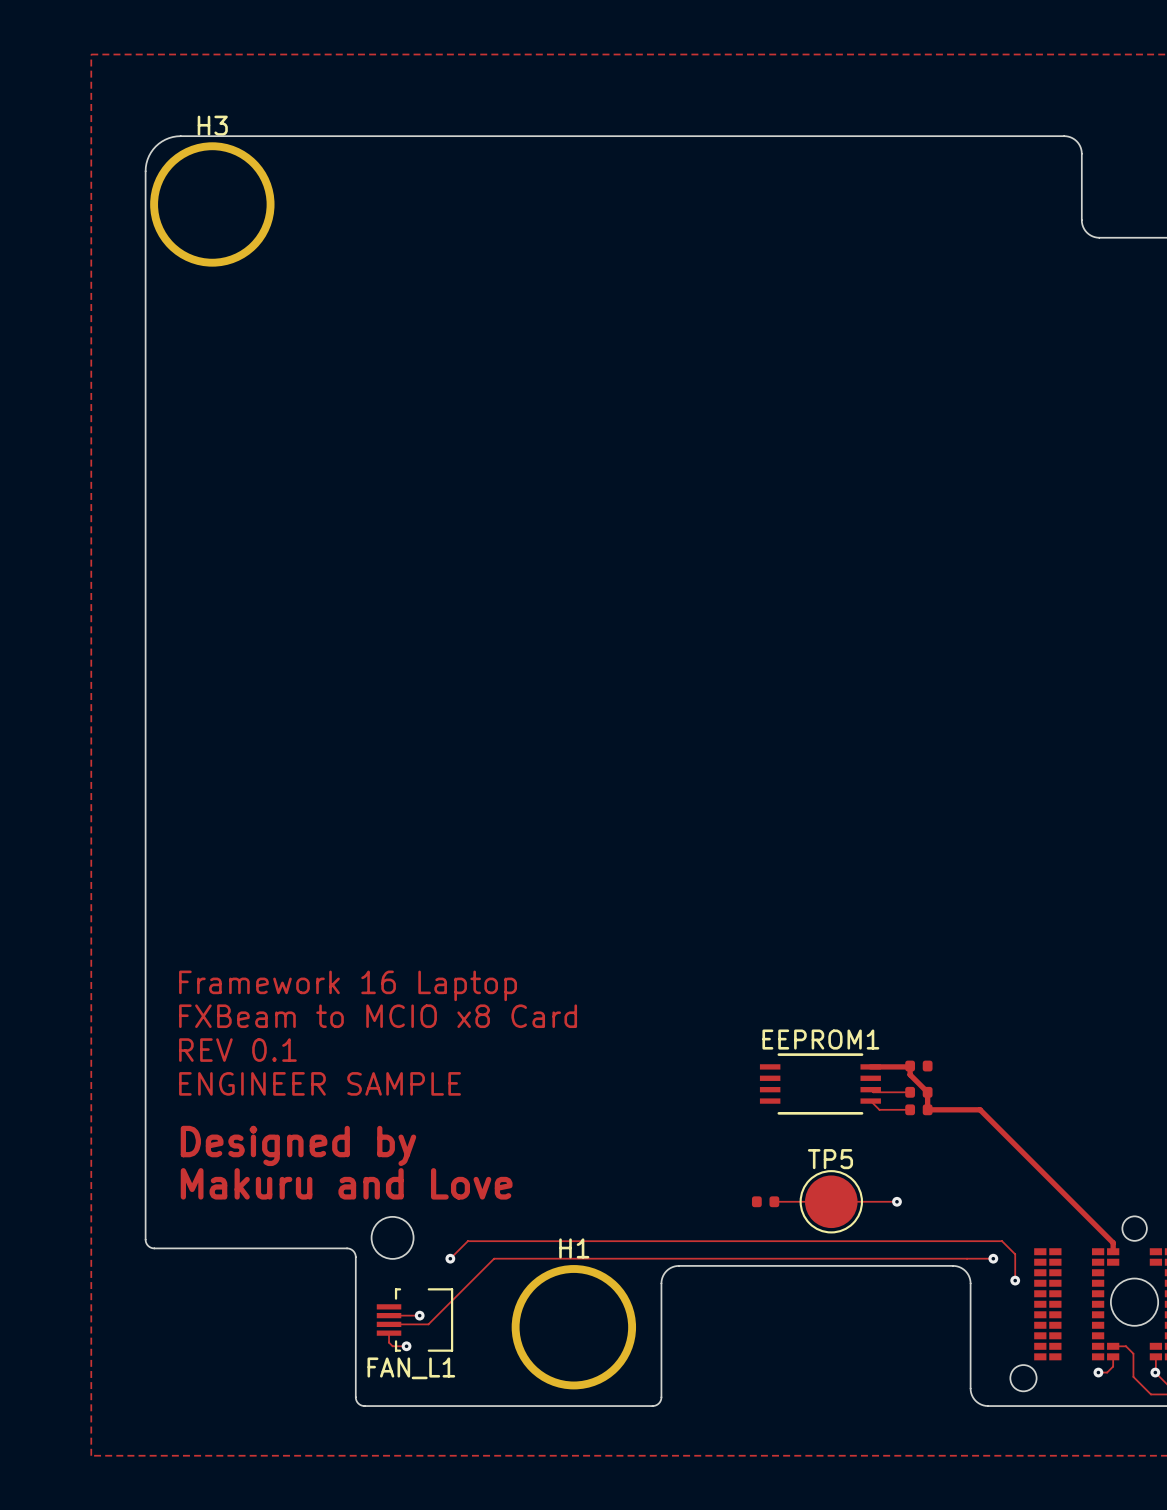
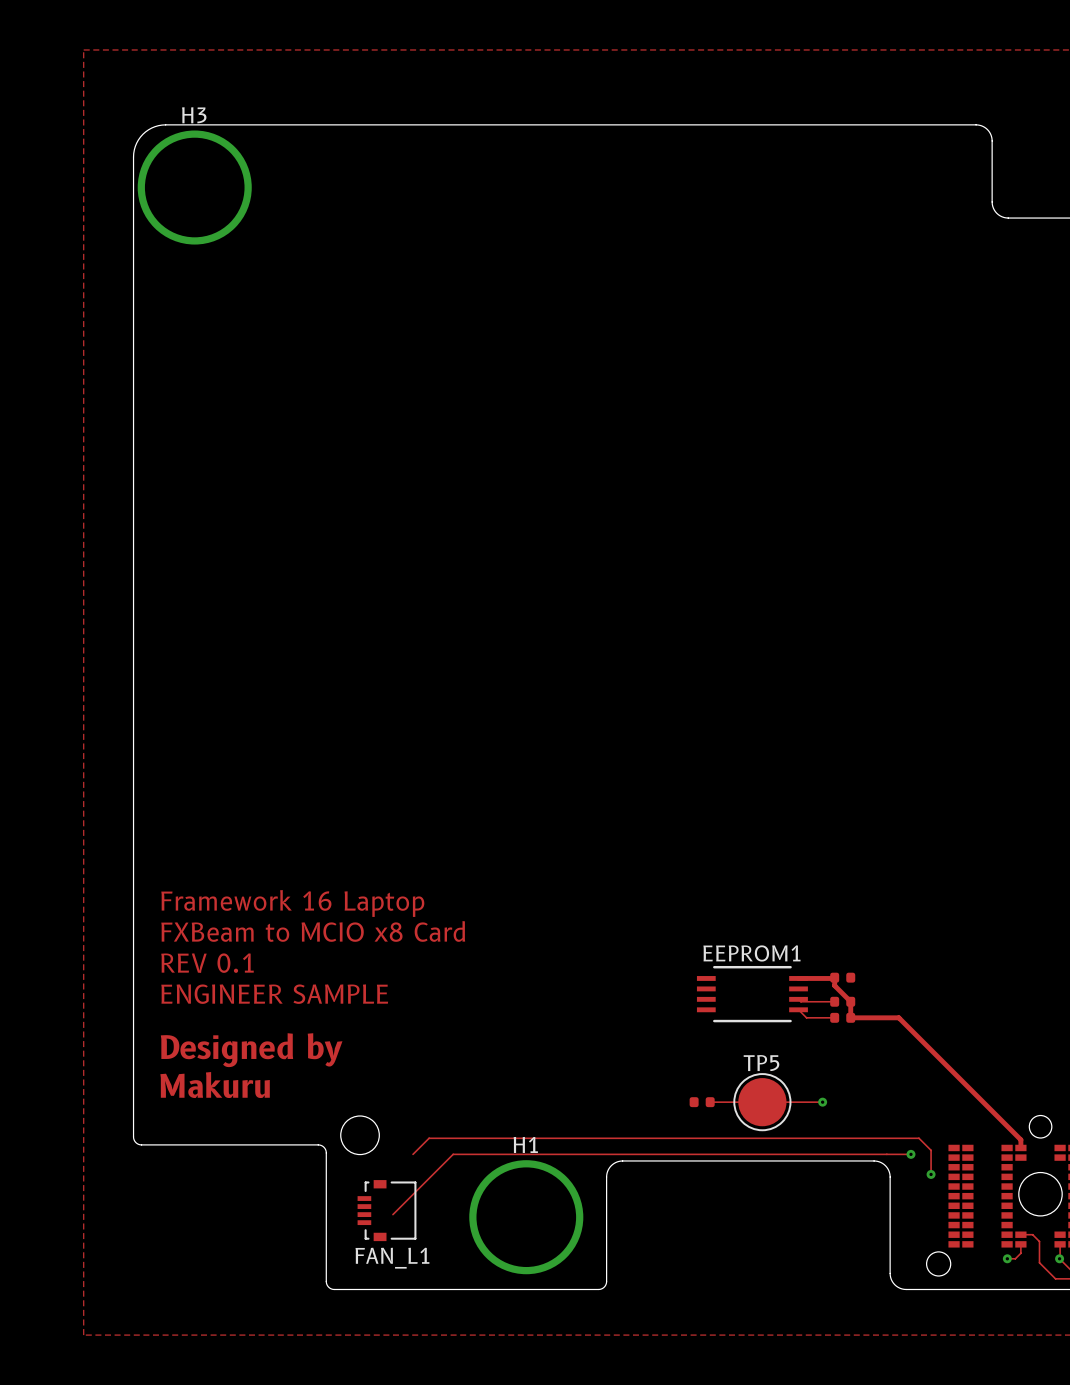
text: Makuru and Love (346, 1183) -> Makuru (215, 1085)
via: (450, 1258) -> none
FAN_L1 footprint: [376, 1288, 454, 1352] -> [357, 1180, 417, 1242]
track: (389, 1315) (419, 1315) -> none
via: (419, 1315) -> none
track: (389, 1324) (428, 1324) -> none
track: (389, 1333) (389, 1342) (392, 1346) (406, 1346) -> none
via: (406, 1346) -> none

